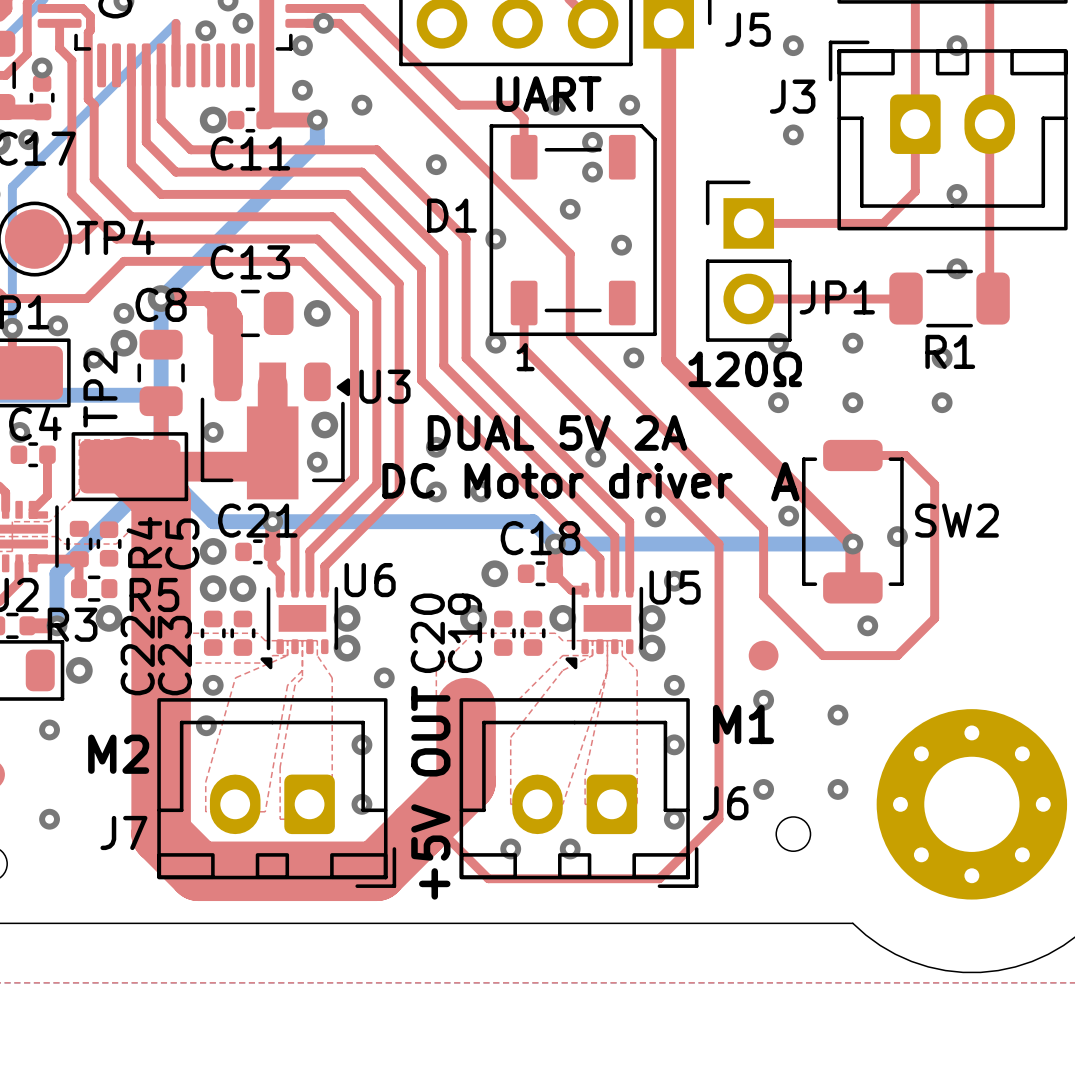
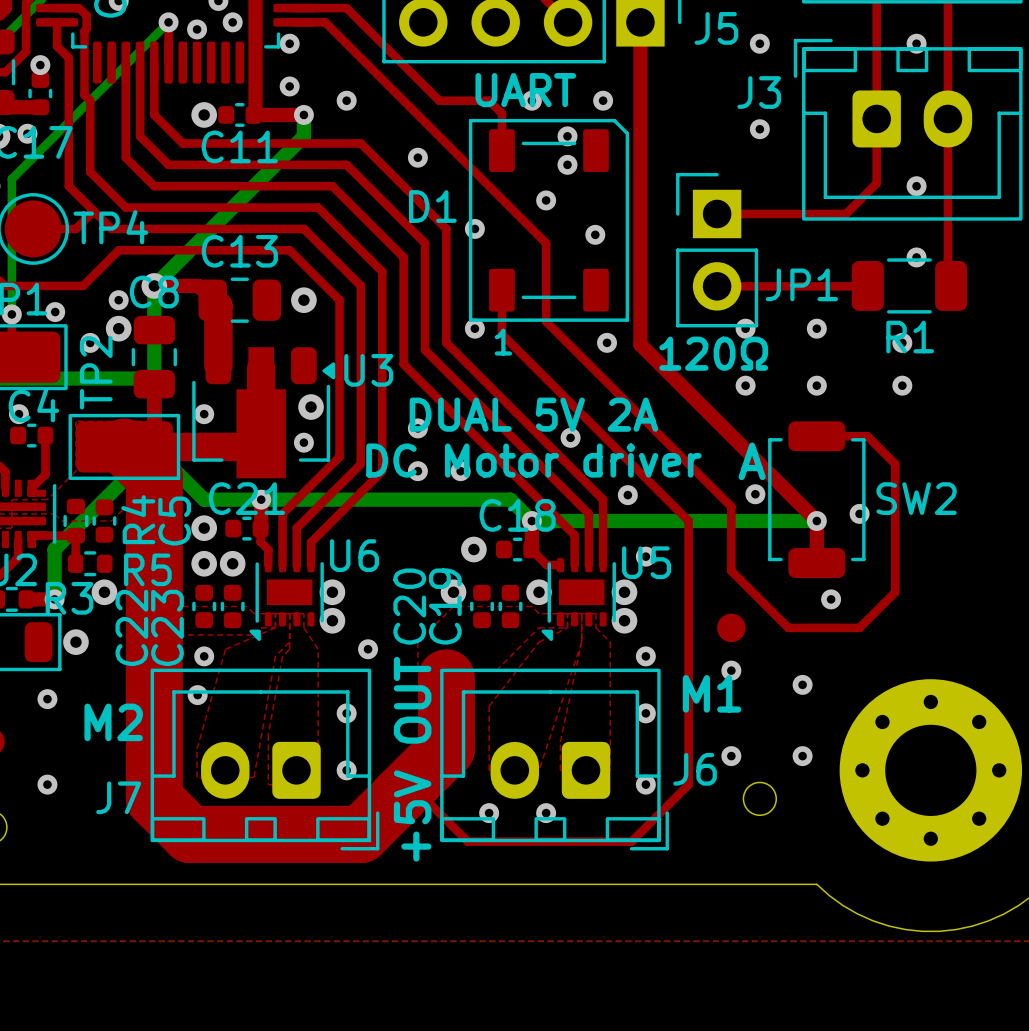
via: none -> (168, 22)
via: (323, 23) -> none

